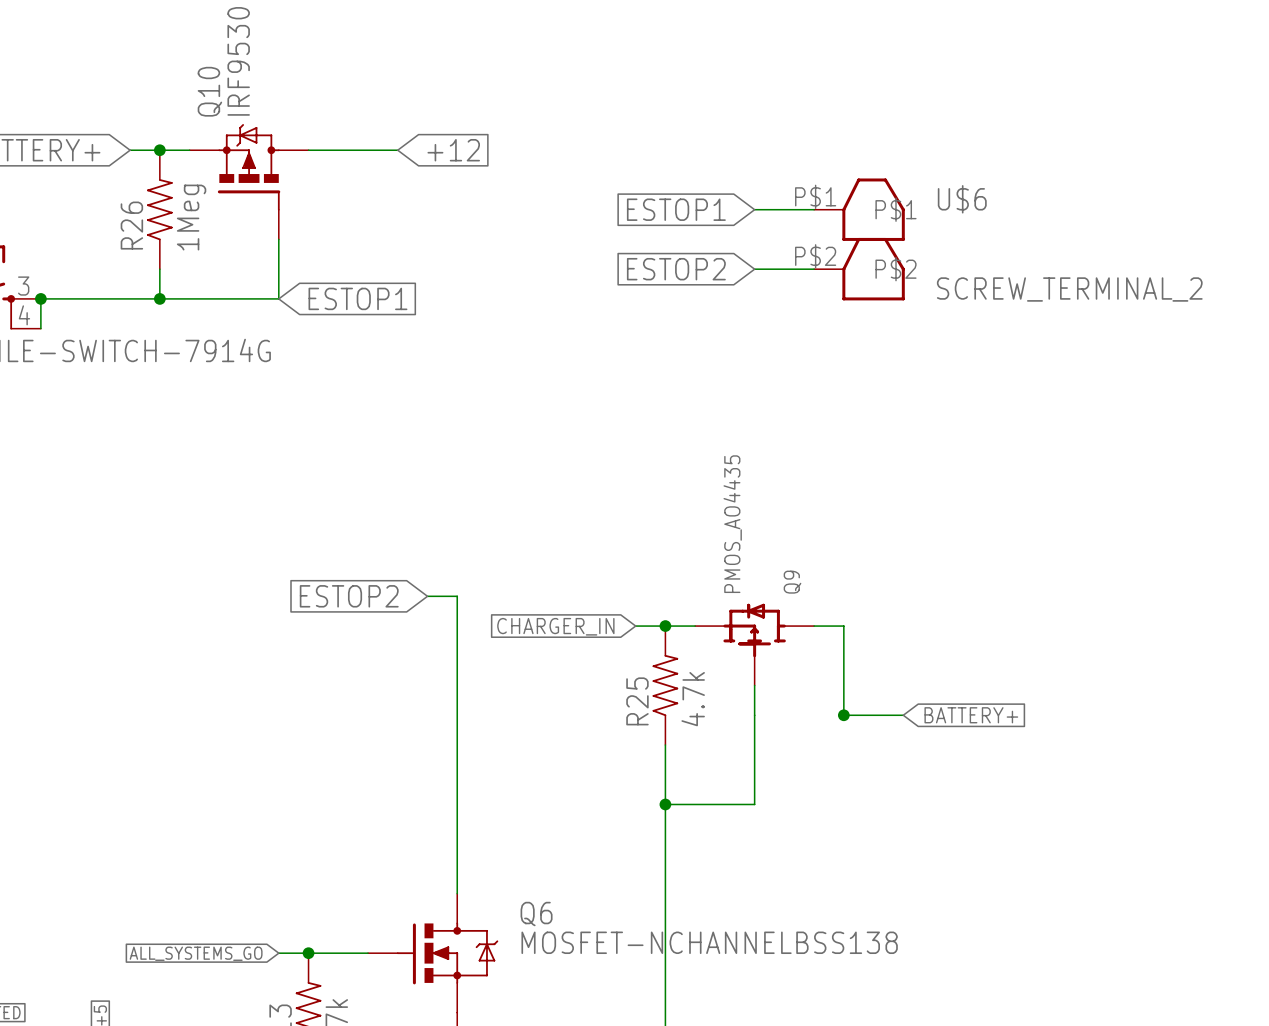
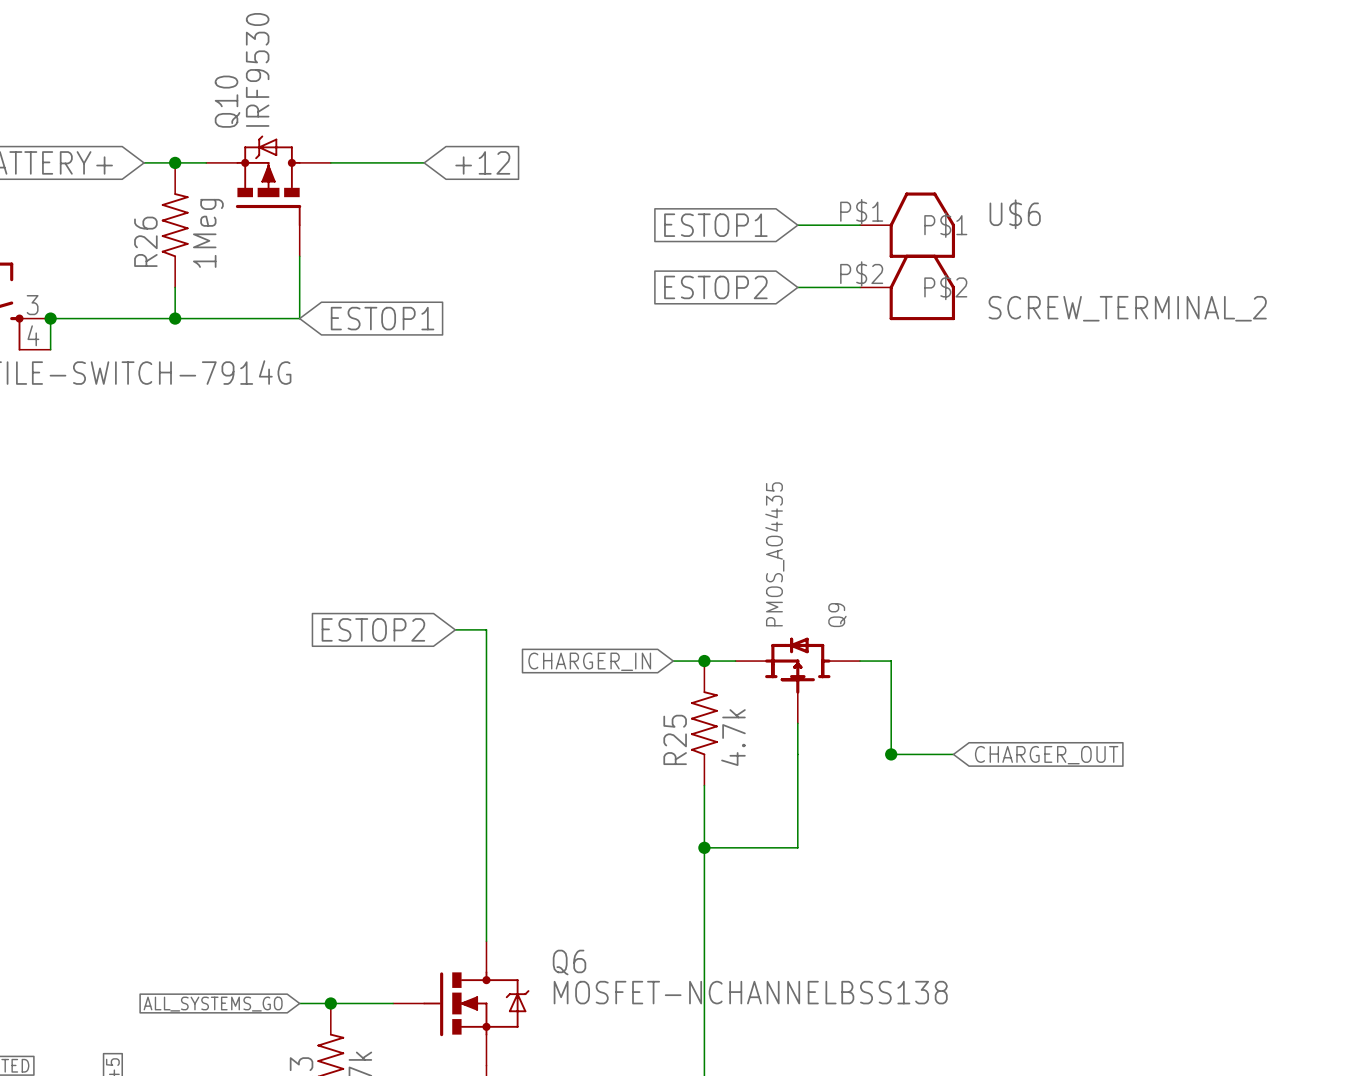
global label: BATTERY+ (971, 715) -> CHARGER_OUT (1046, 755)

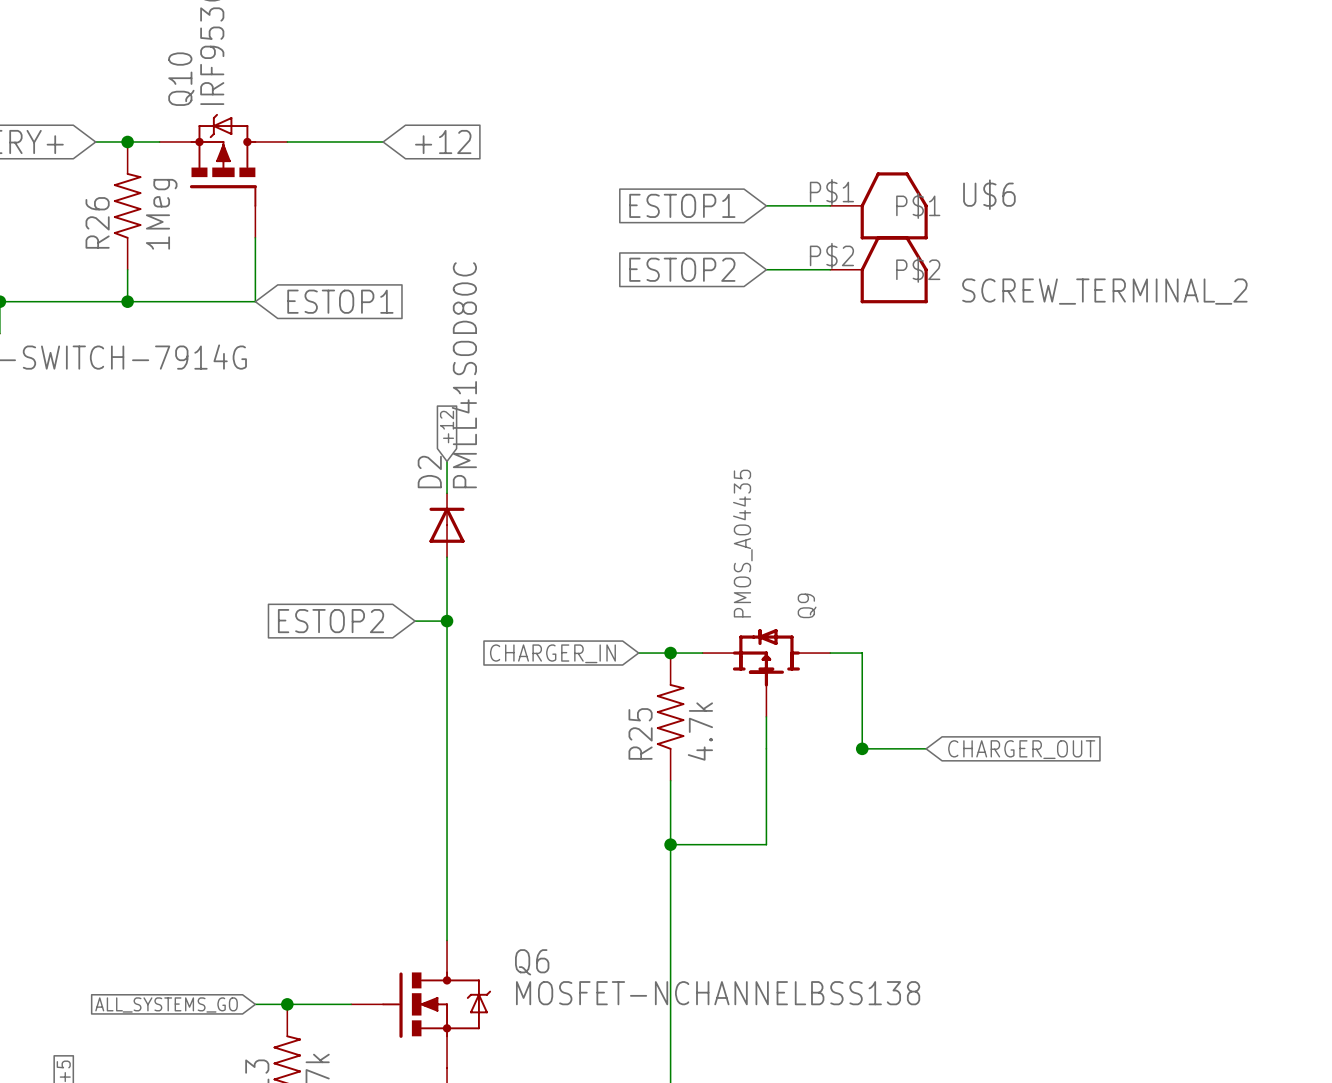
global label: none -> +12 (447, 427)
wire: none -> (447, 461) (447, 493)
D2: none -> PMLL41SOD80C (447, 525)
wire: none -> (447, 557) (447, 621)
junction: none -> (447, 621)

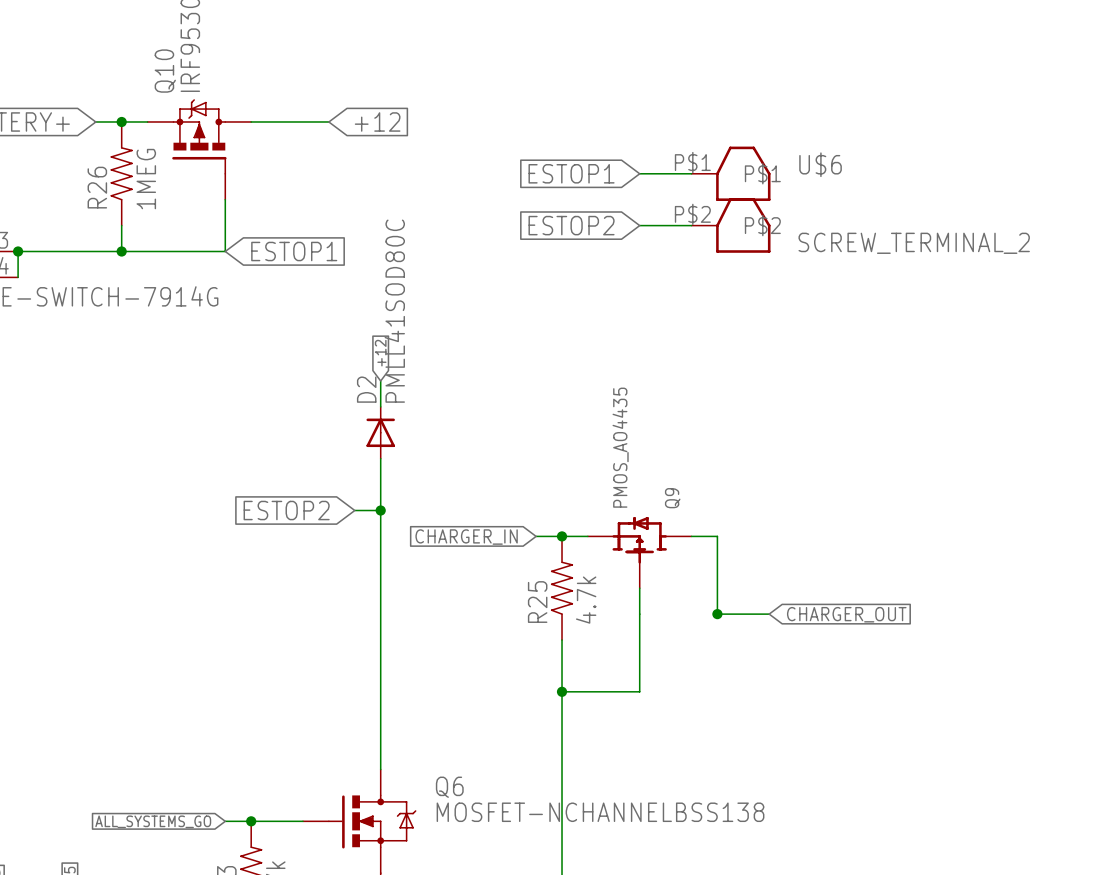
R26 value: 1Meg (161, 214) -> 1MEG (146, 179)

